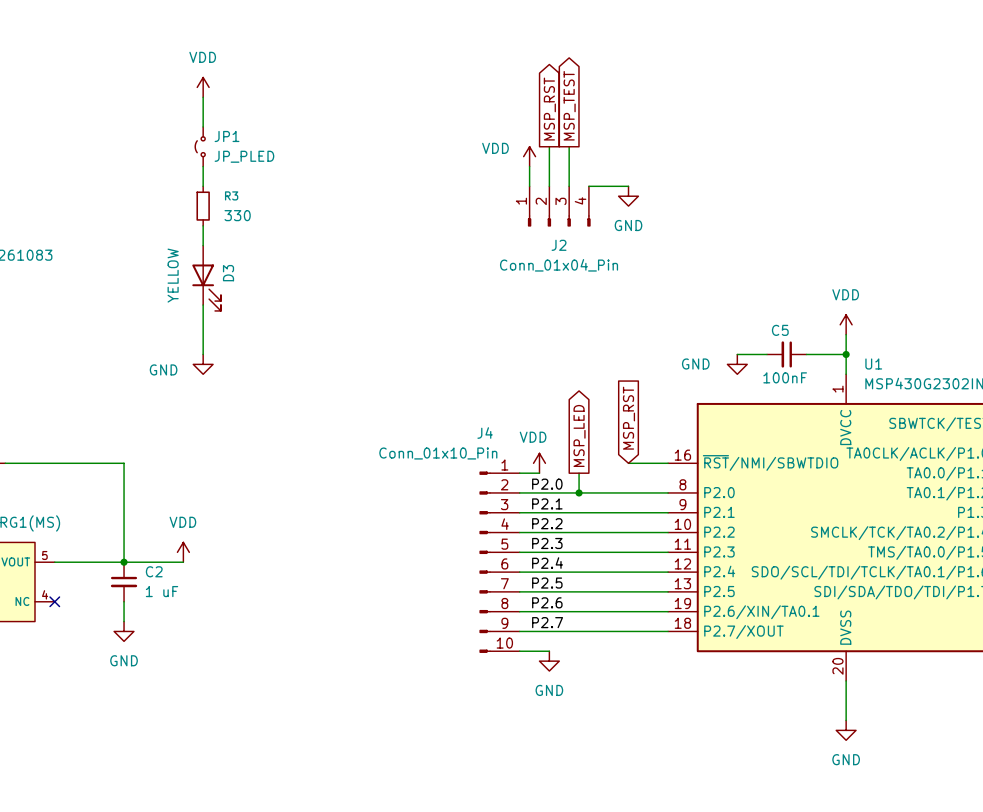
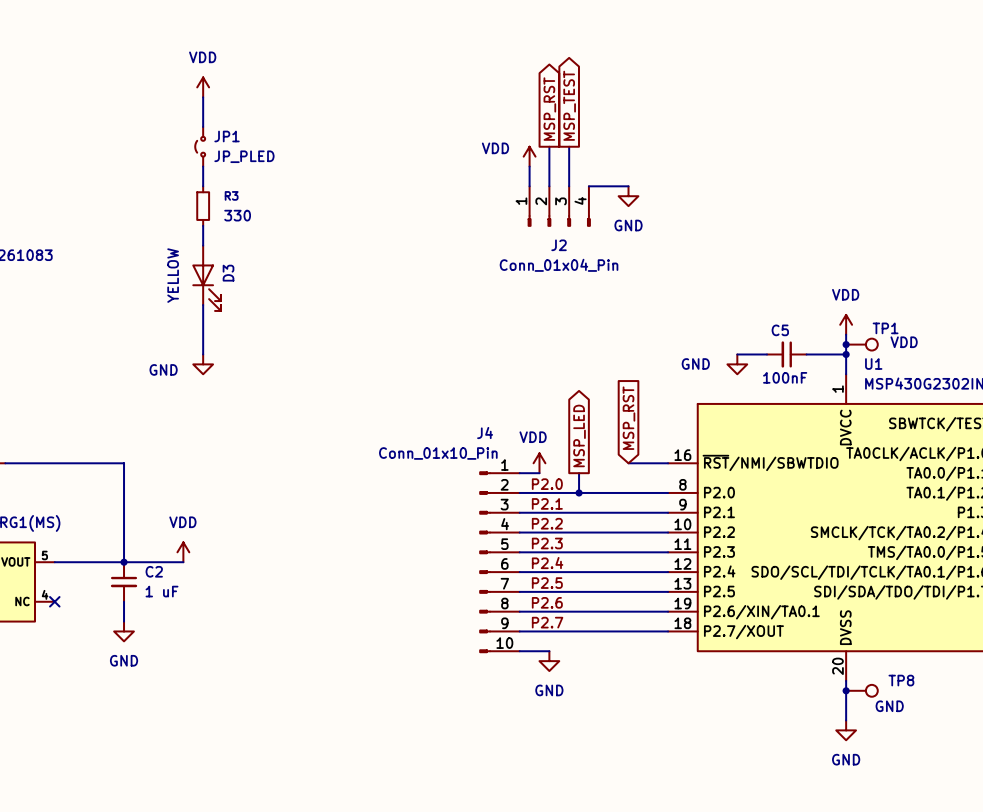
junction: none -> (846, 344)
TP1: none -> VDD (861, 344)
junction: none -> (846, 690)
TP8: none -> GND (861, 690)

